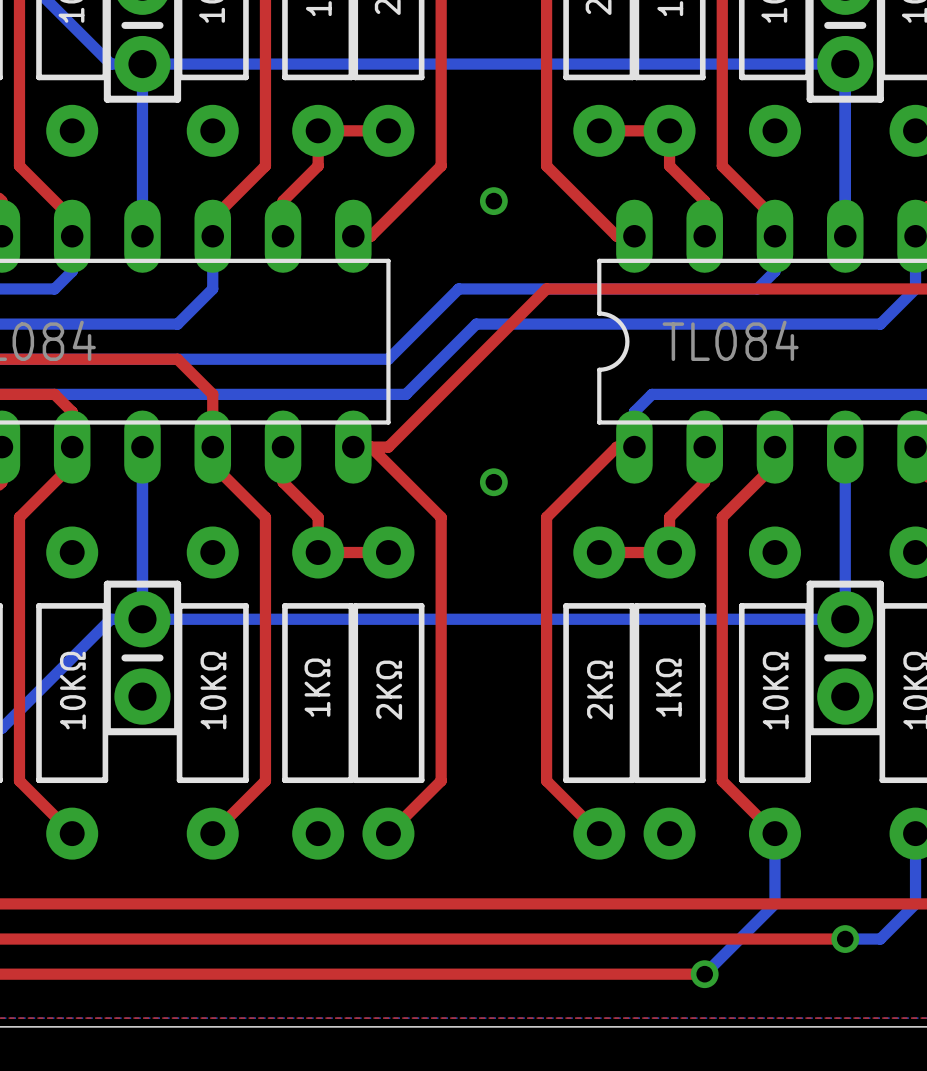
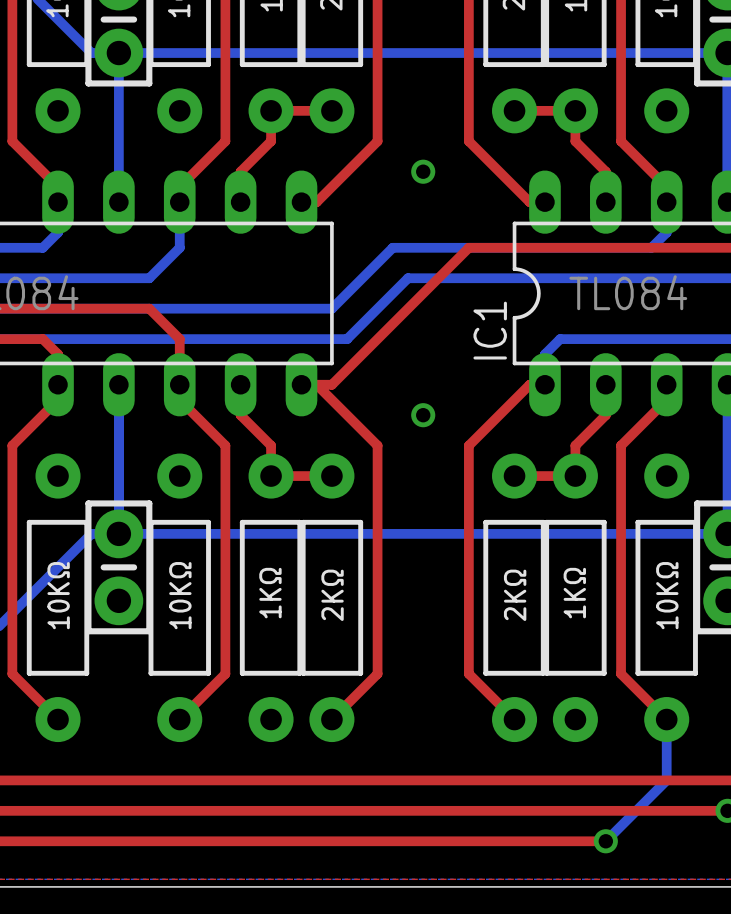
IC1 name: none -> IC1 (490, 330)

